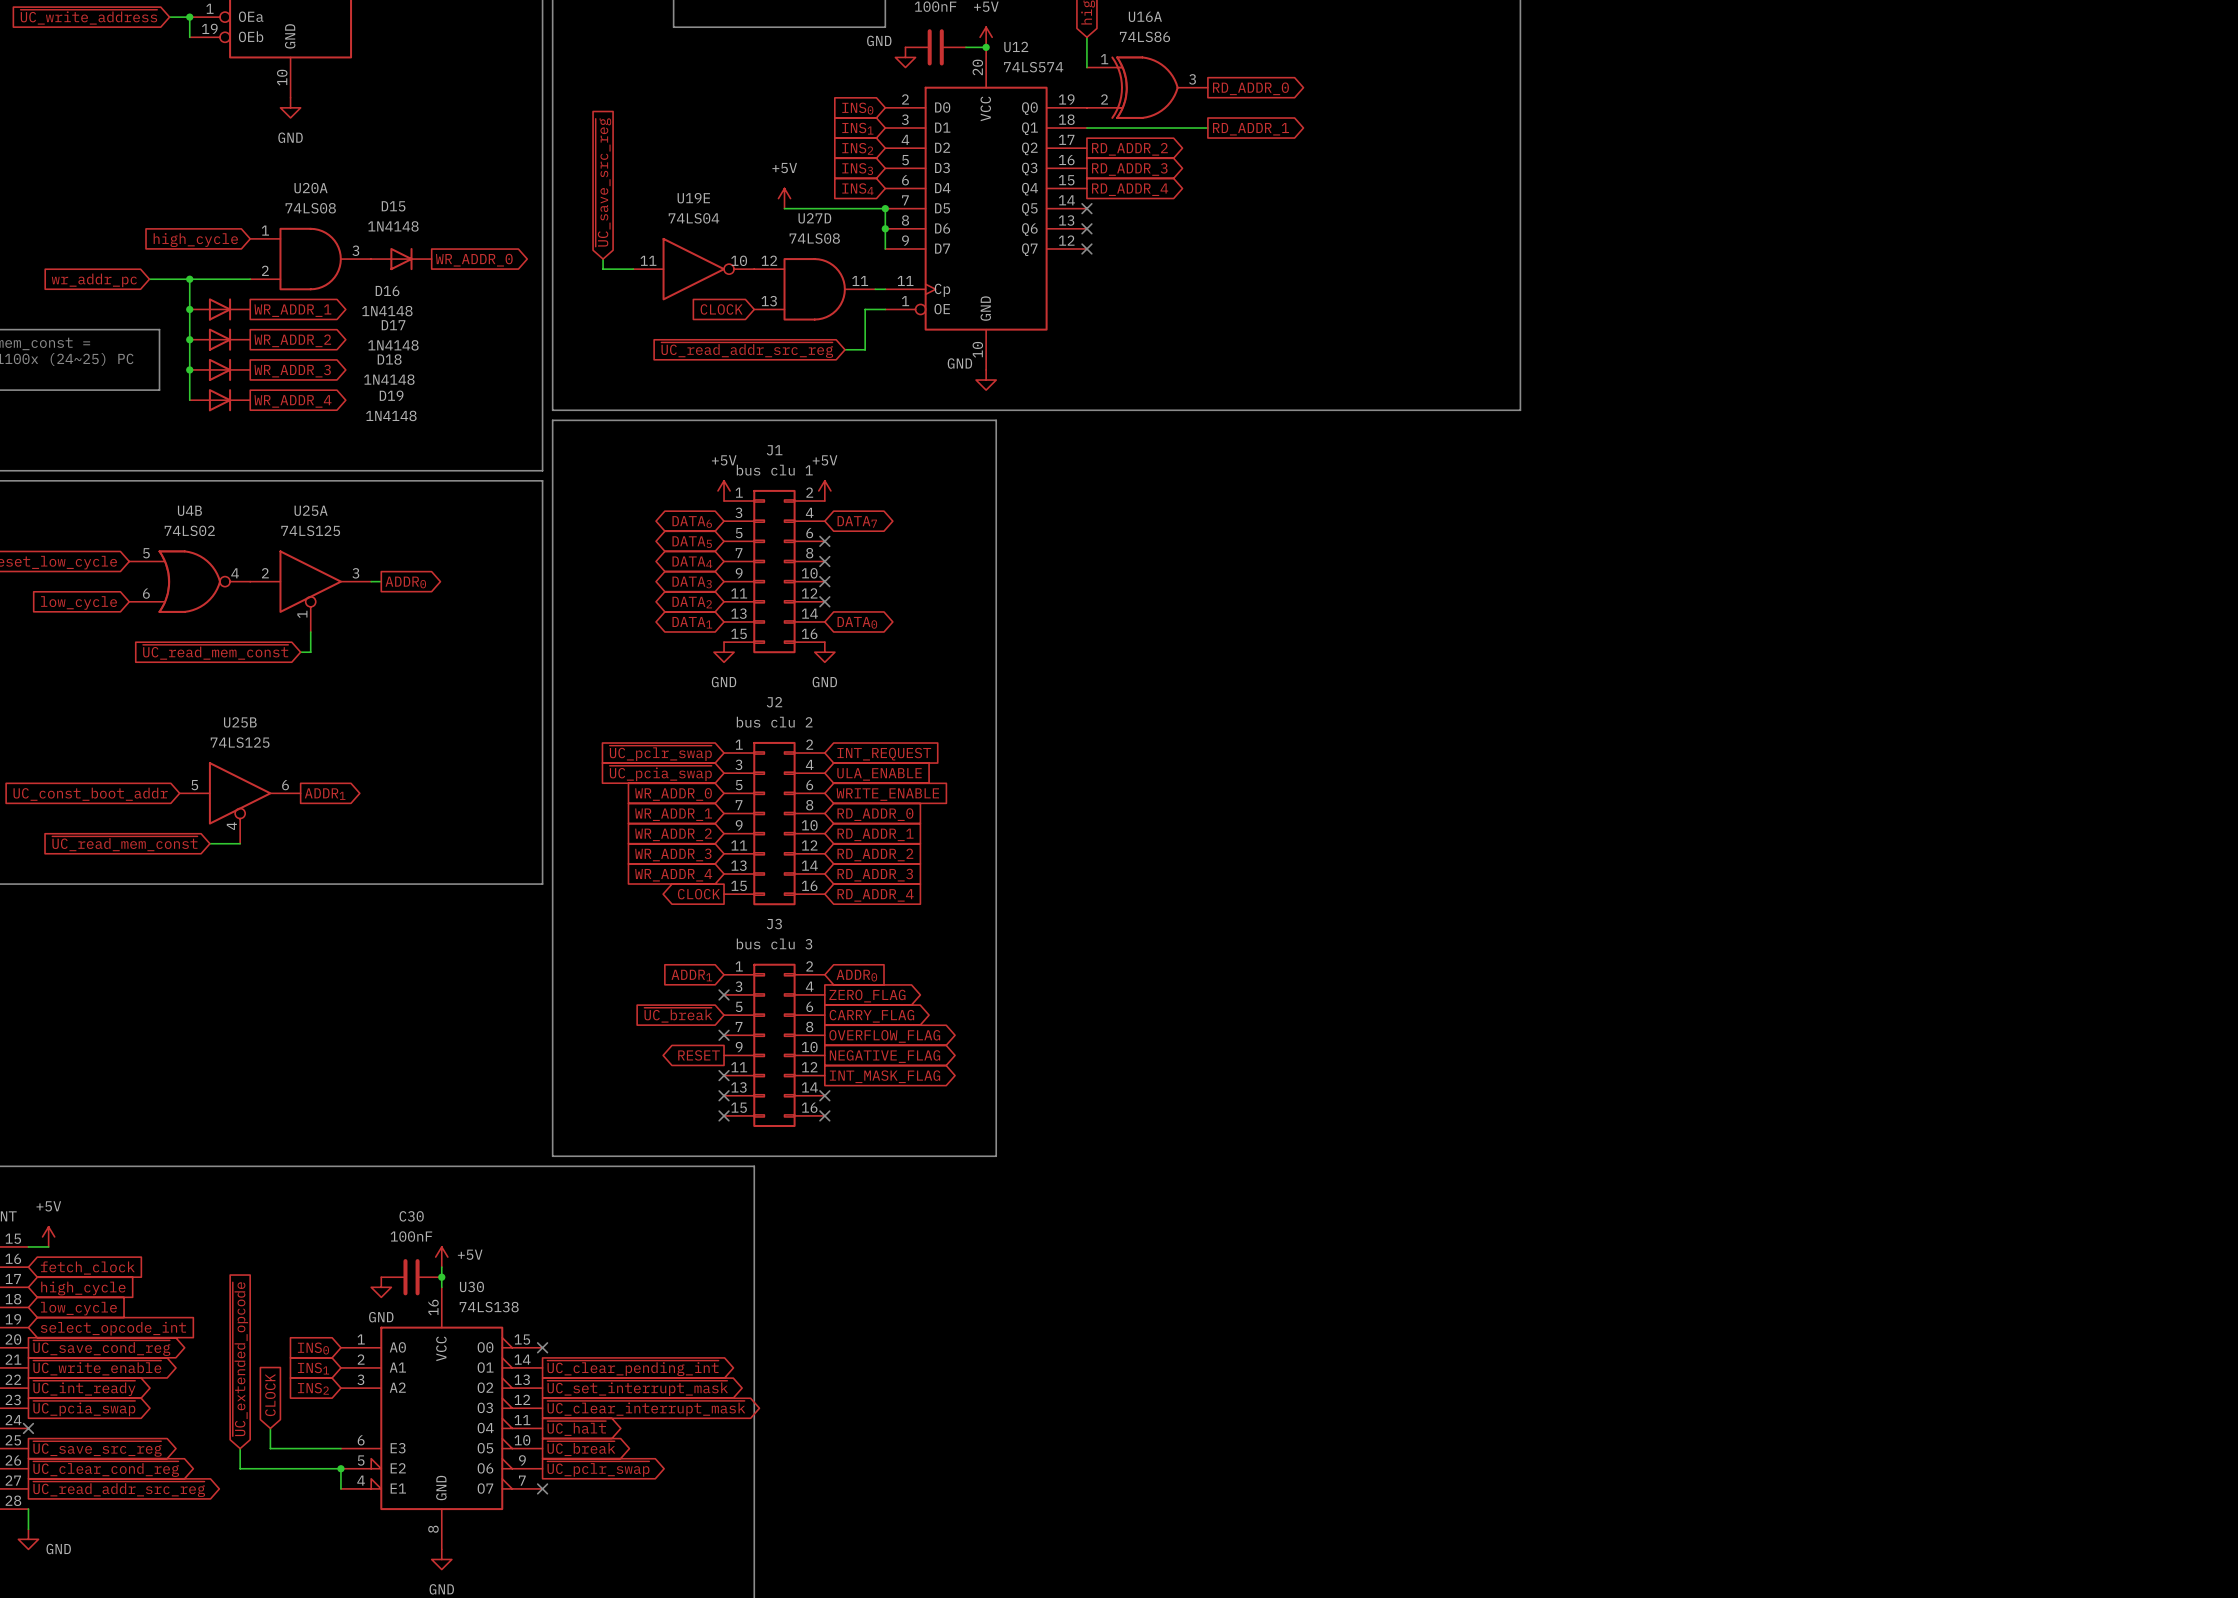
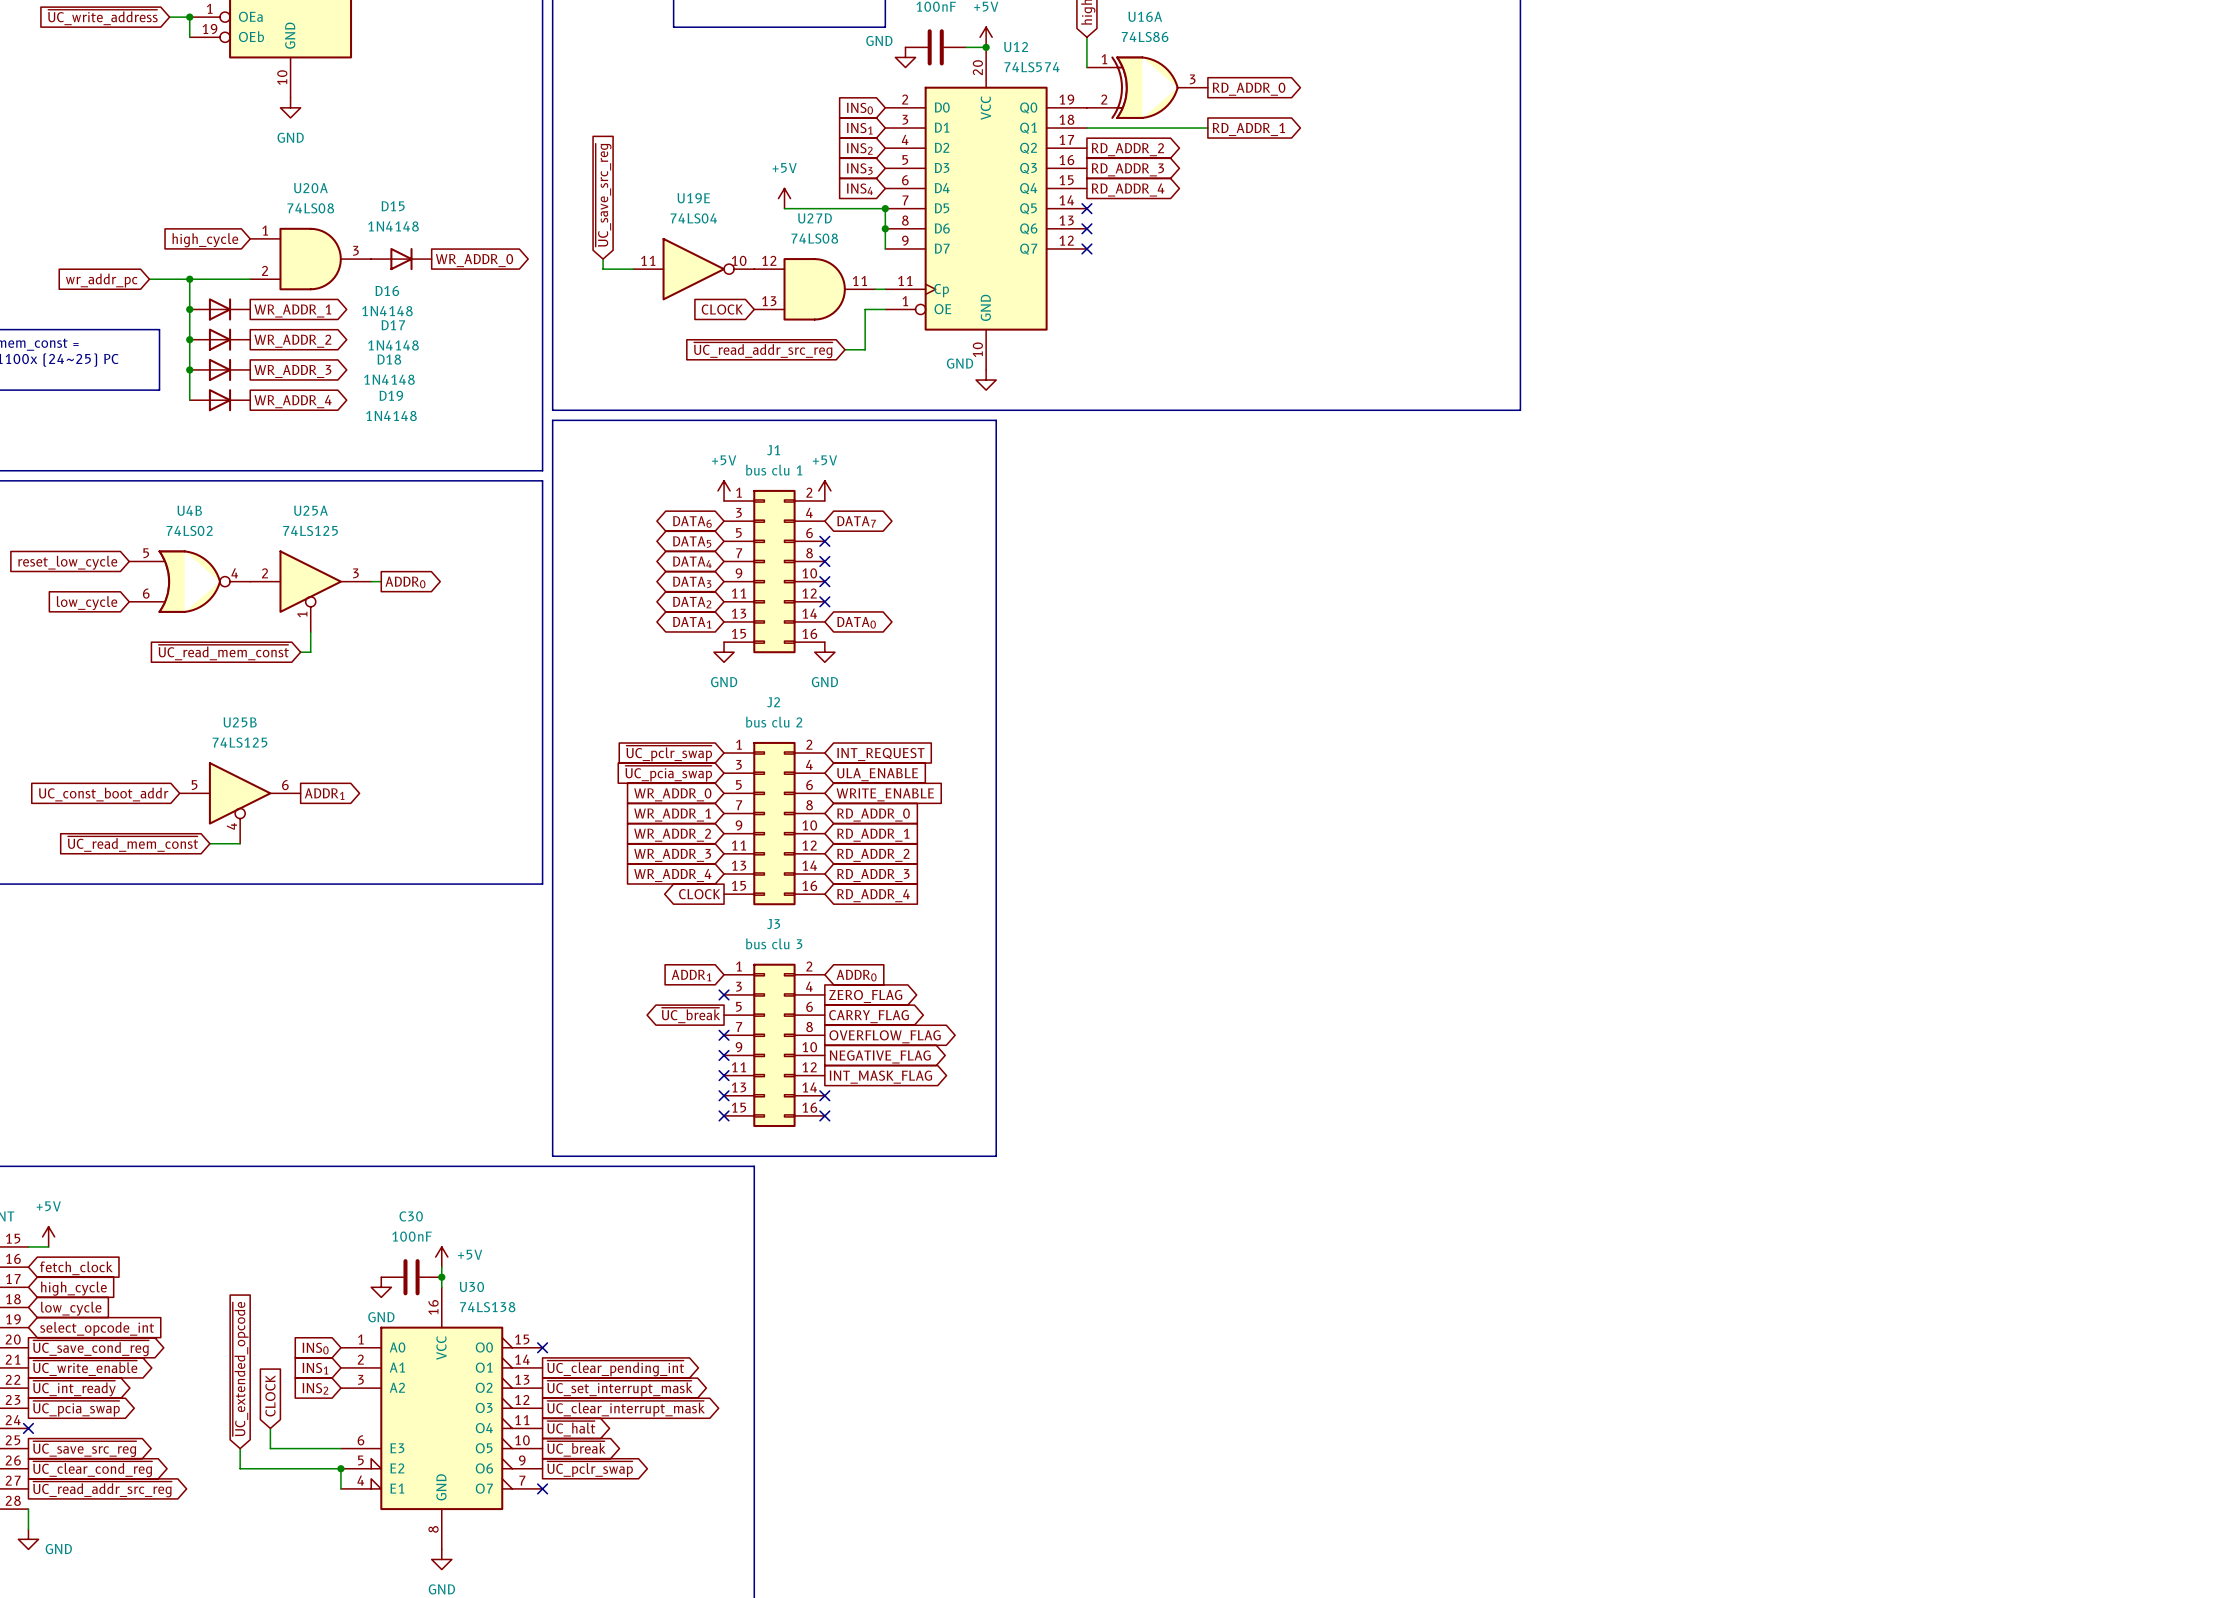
global label shape: input (678, 1015) -> output (691, 1015)
global label: RESET (699, 1055) -> none
no-connect mark: none -> (724, 1055)

